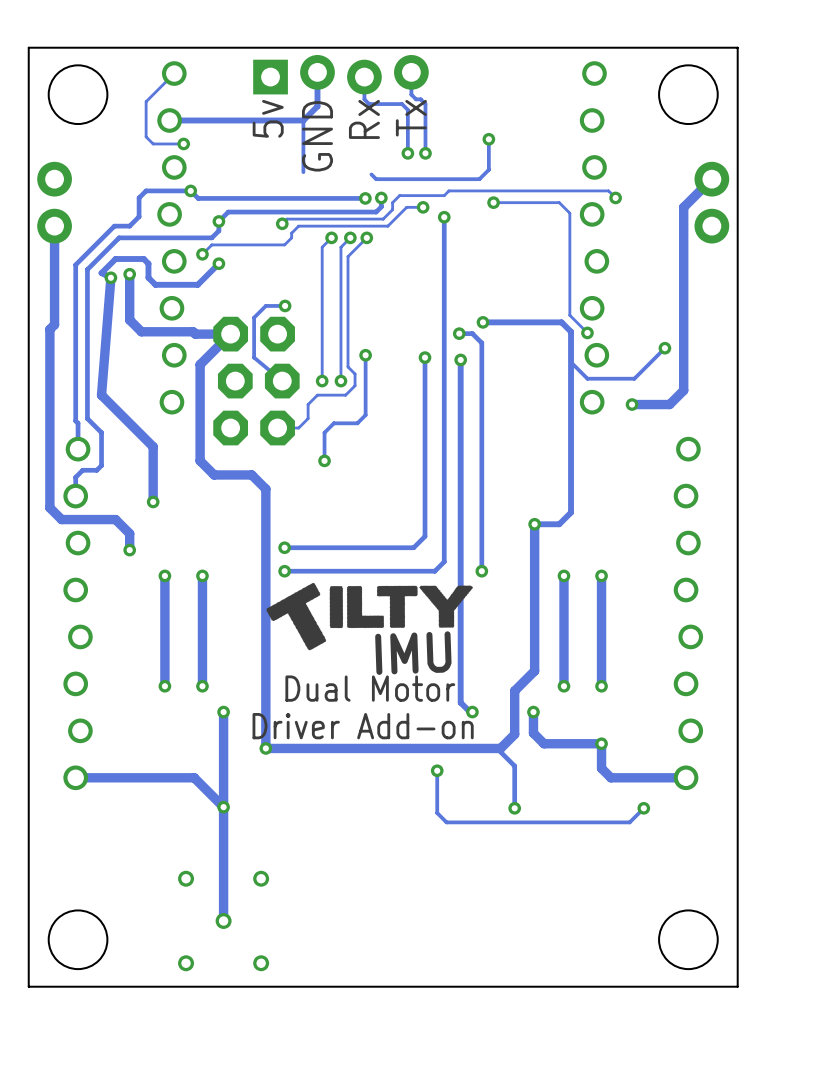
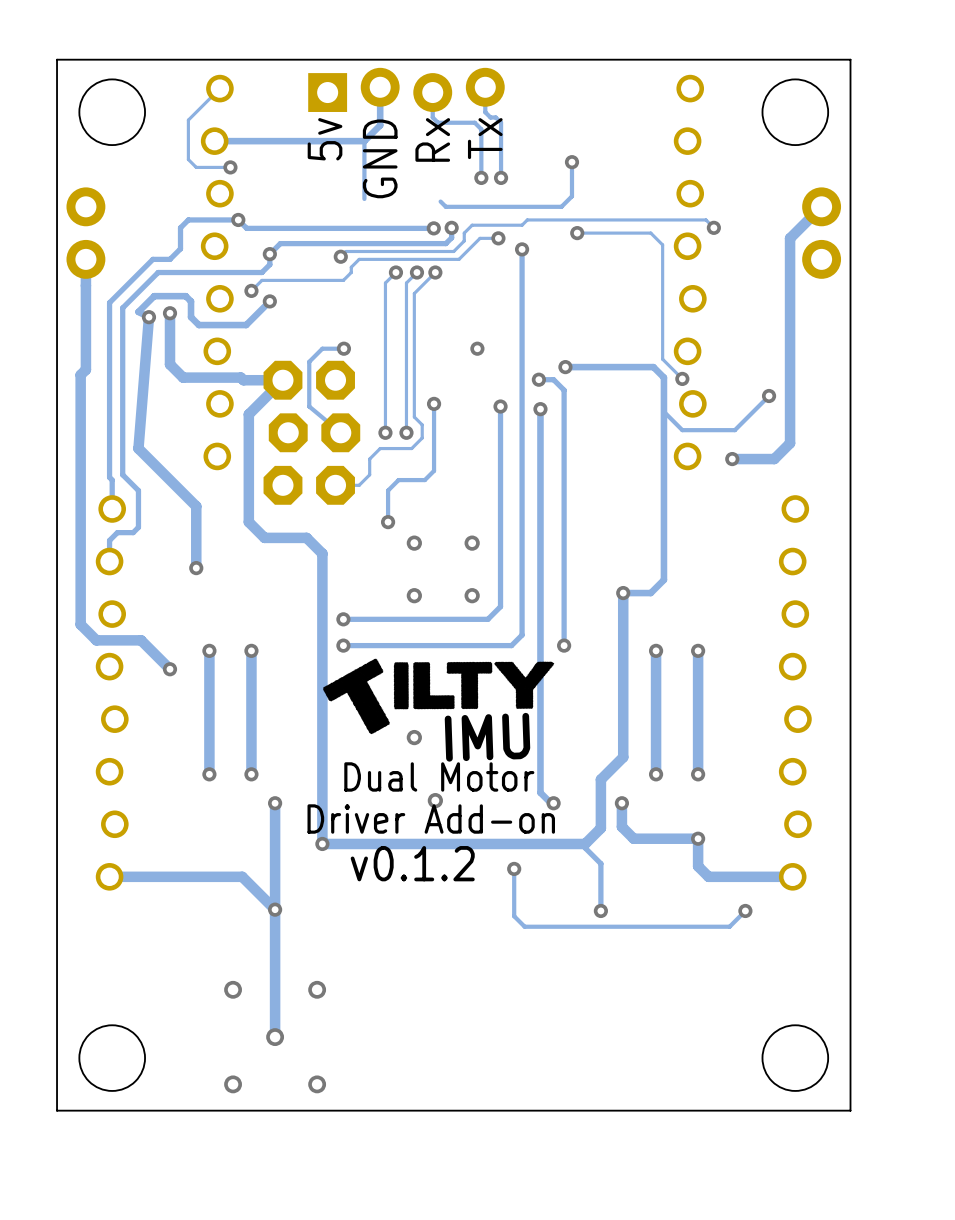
via: none -> (477, 348)
via: none -> (414, 543)
via: none -> (472, 543)
track: (49, 507) (61, 519) (115, 519) (129, 533) (129, 550) -> (80, 574) (80, 624) (96, 640) (141, 640) (170, 669)
via: none -> (414, 595)
via: none -> (472, 595)
via position: (129, 550) -> (170, 669)
via: none -> (414, 737)
via: none -> (435, 800)
text: none -> v0.1.2 (412, 863)

